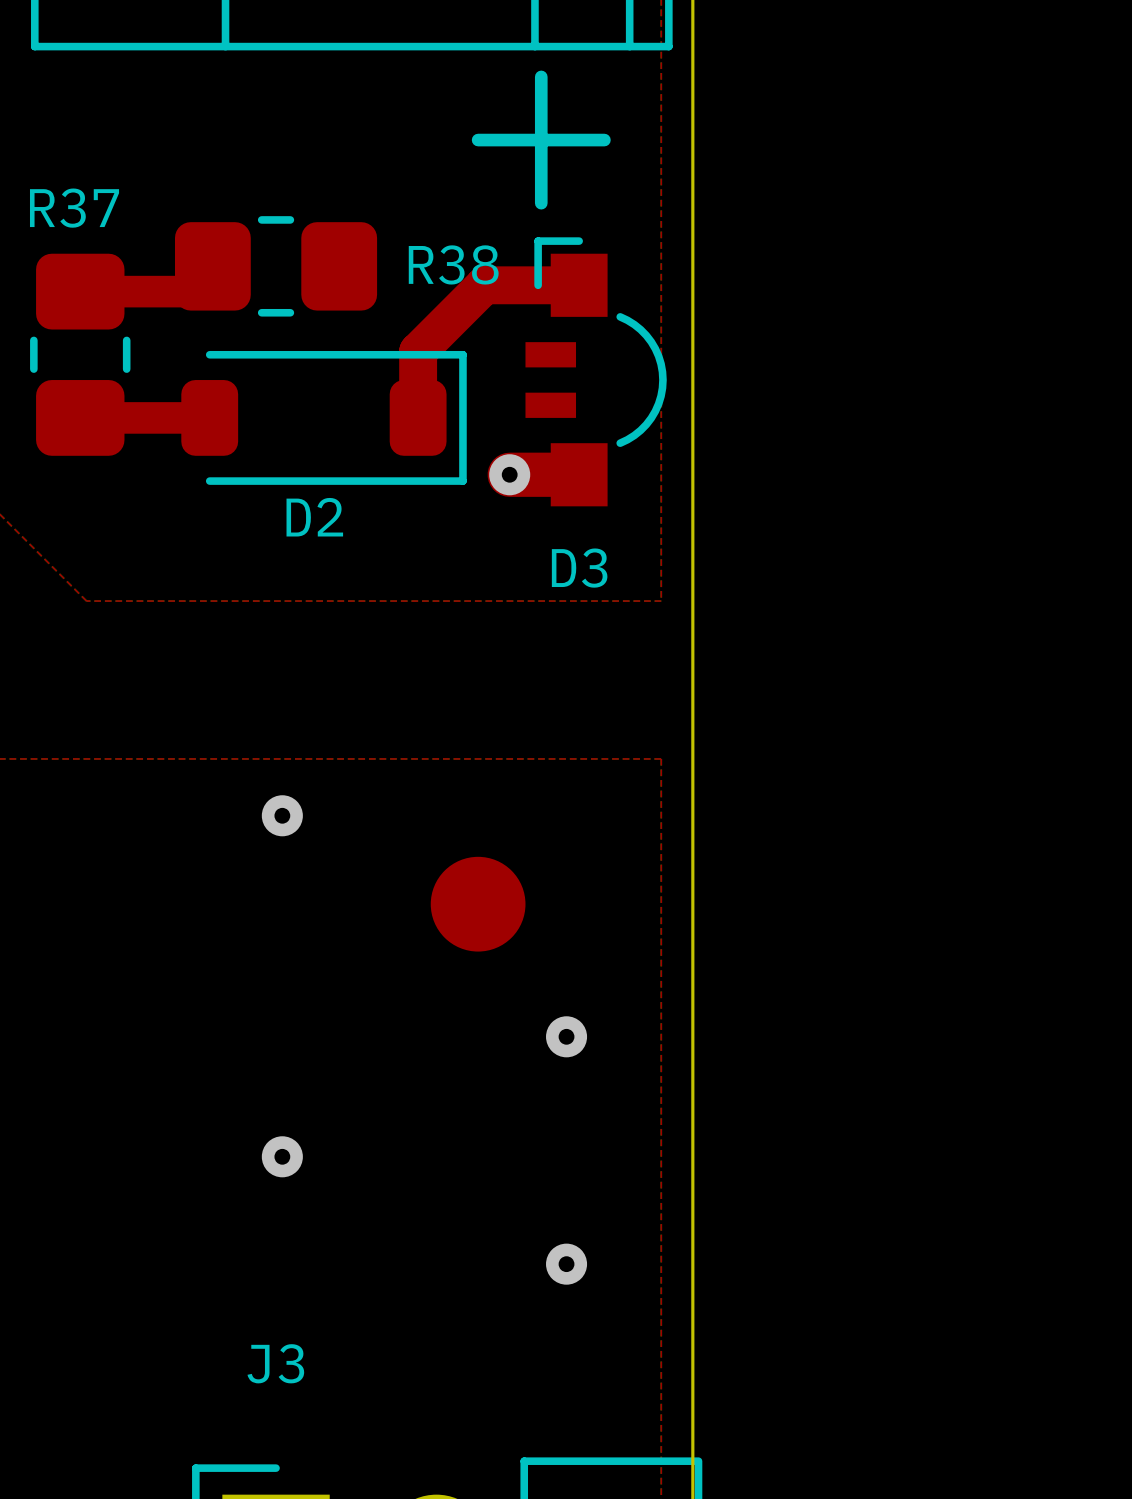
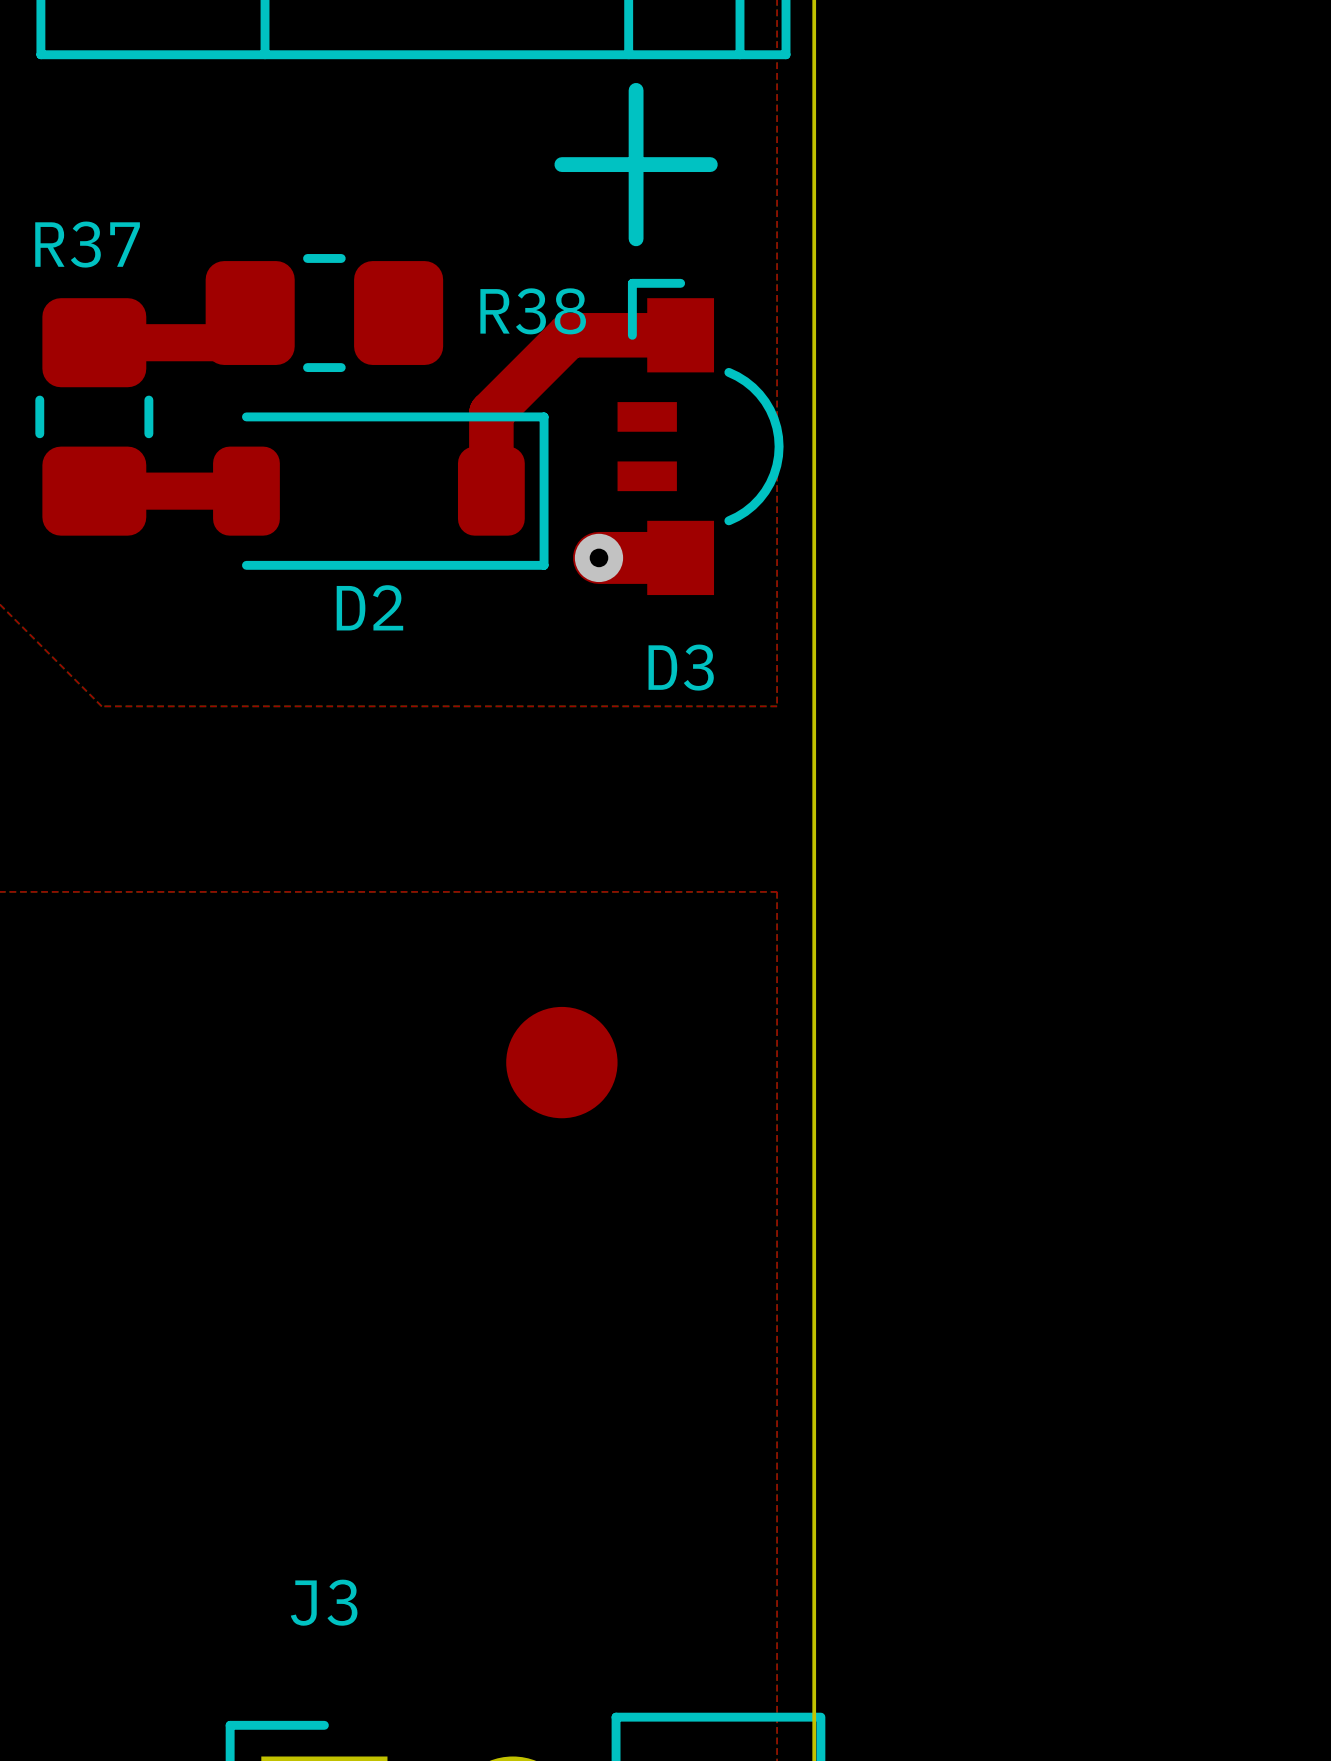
via: (282, 815) -> none
via: (566, 1036) -> none
via: (282, 1156) -> none
via: (566, 1264) -> none

